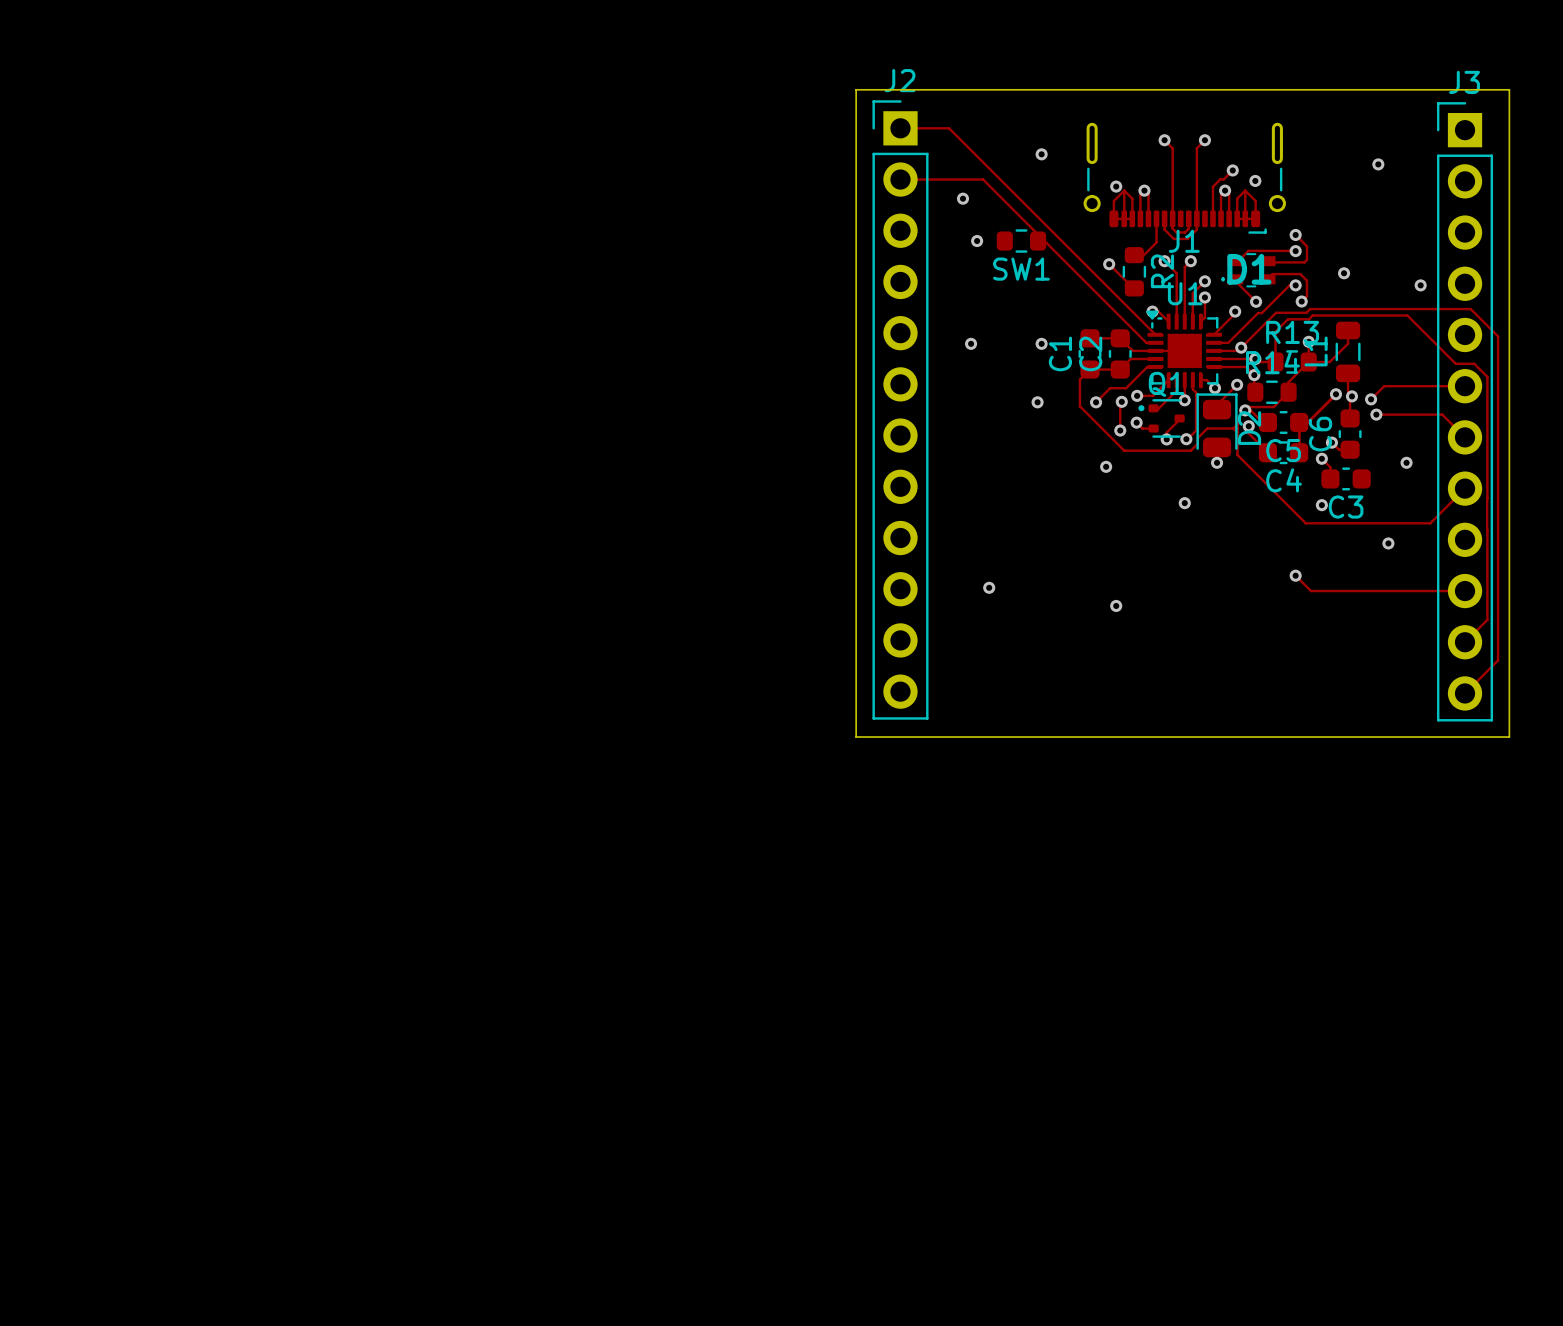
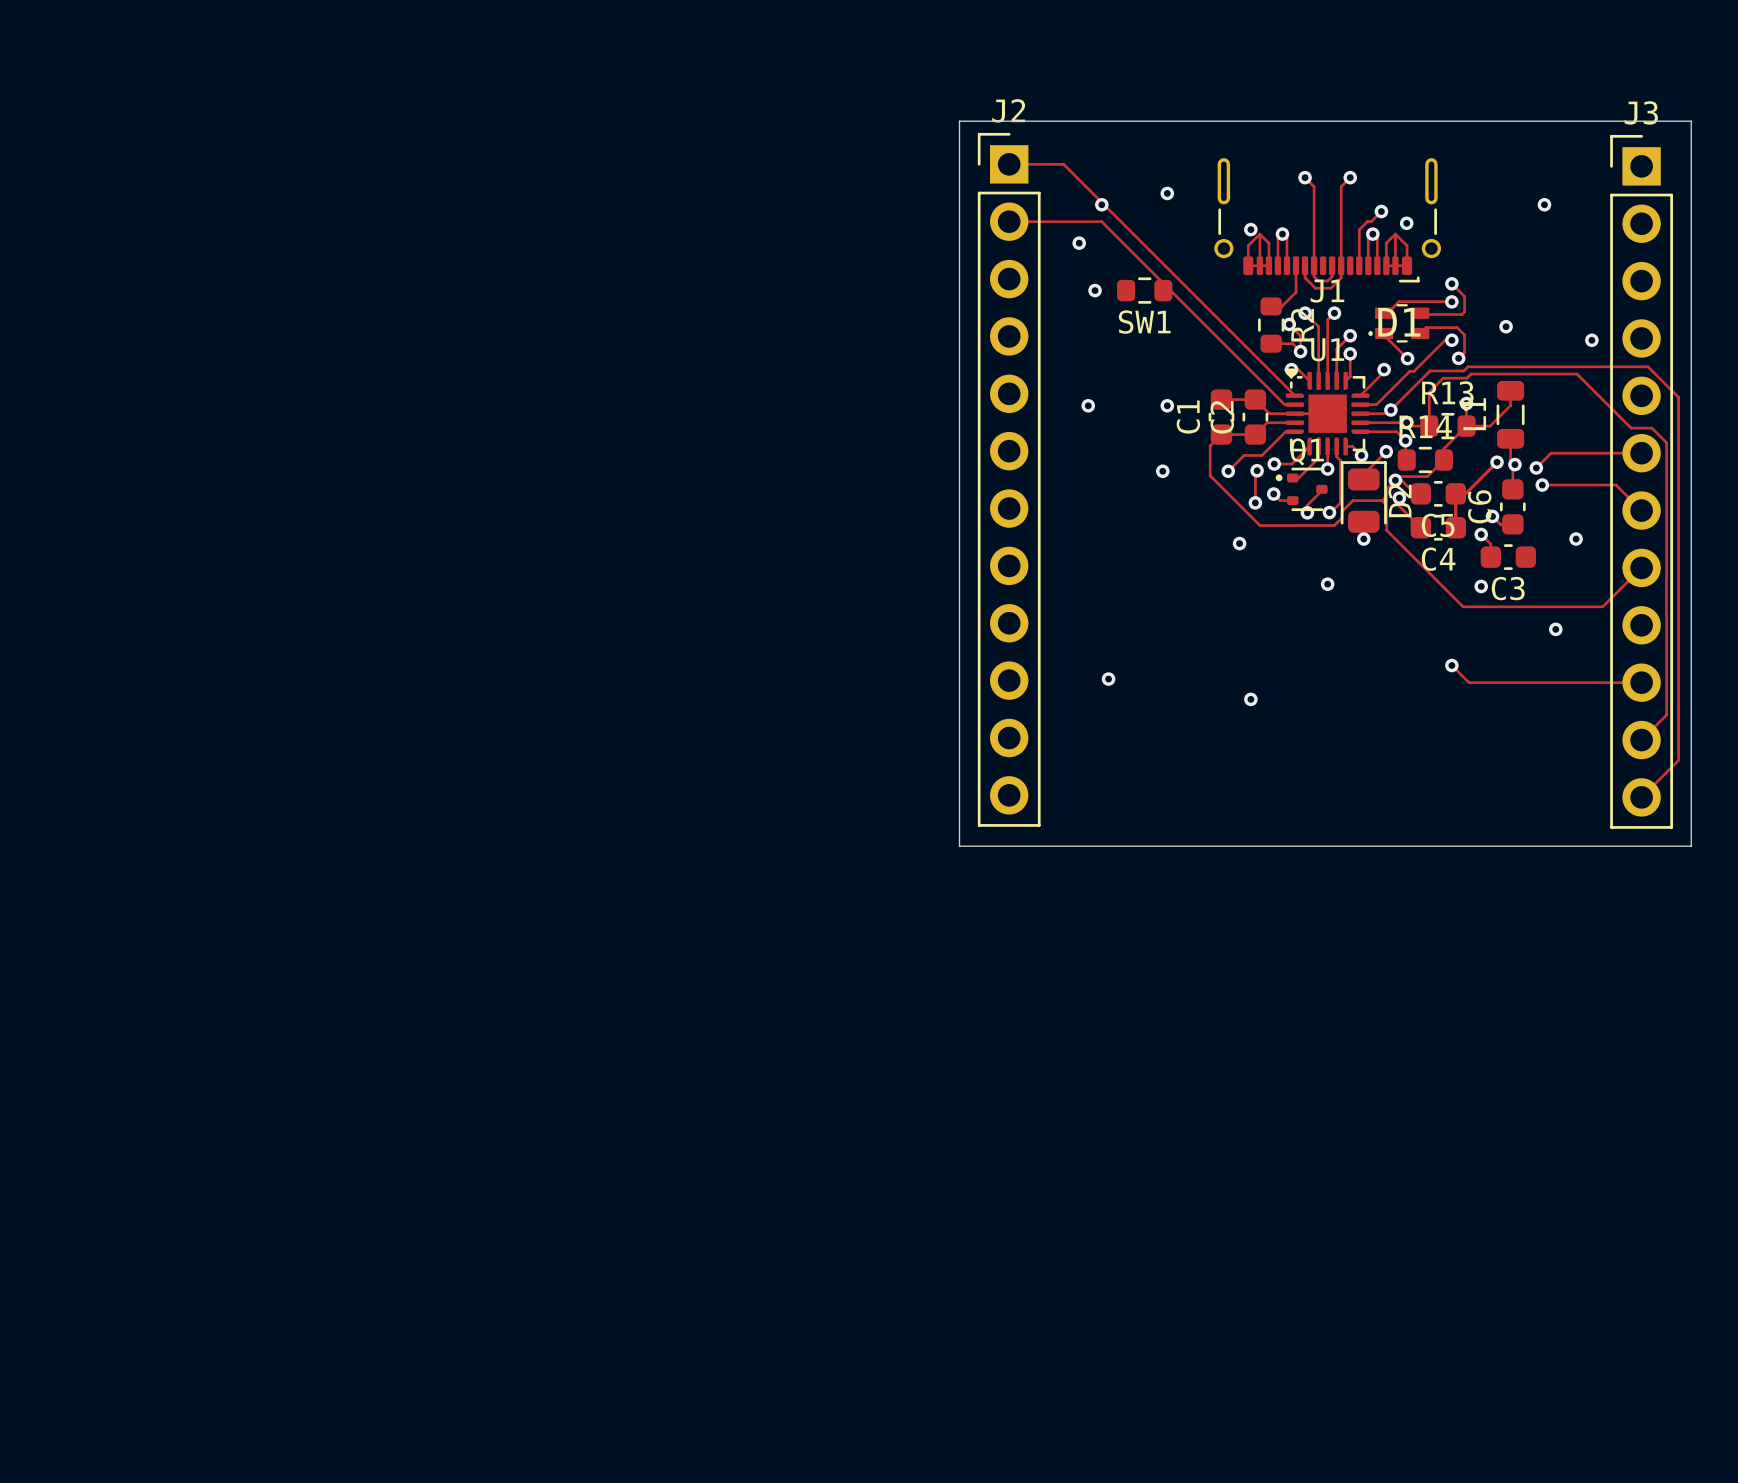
via: none -> (1101, 204)
track: (1109, 264) (1134, 288) -> (1289, 324) (1300, 335) (1300, 351) (1292, 343) (1271, 343)
via: (1109, 264) -> none
via: none -> (1289, 324)
via: none -> (1300, 351)

